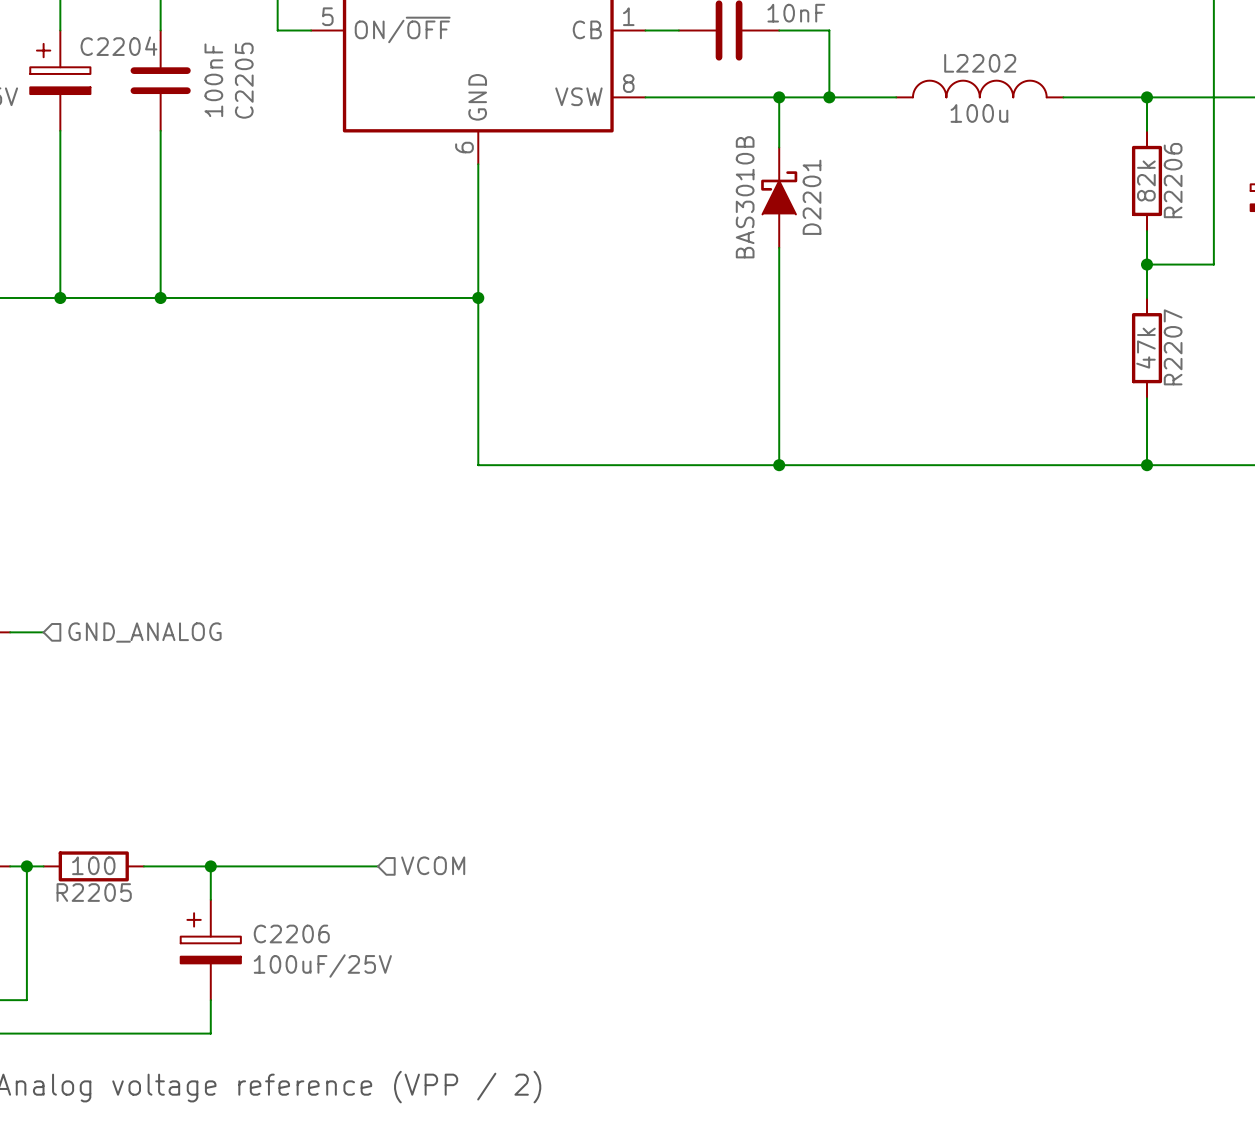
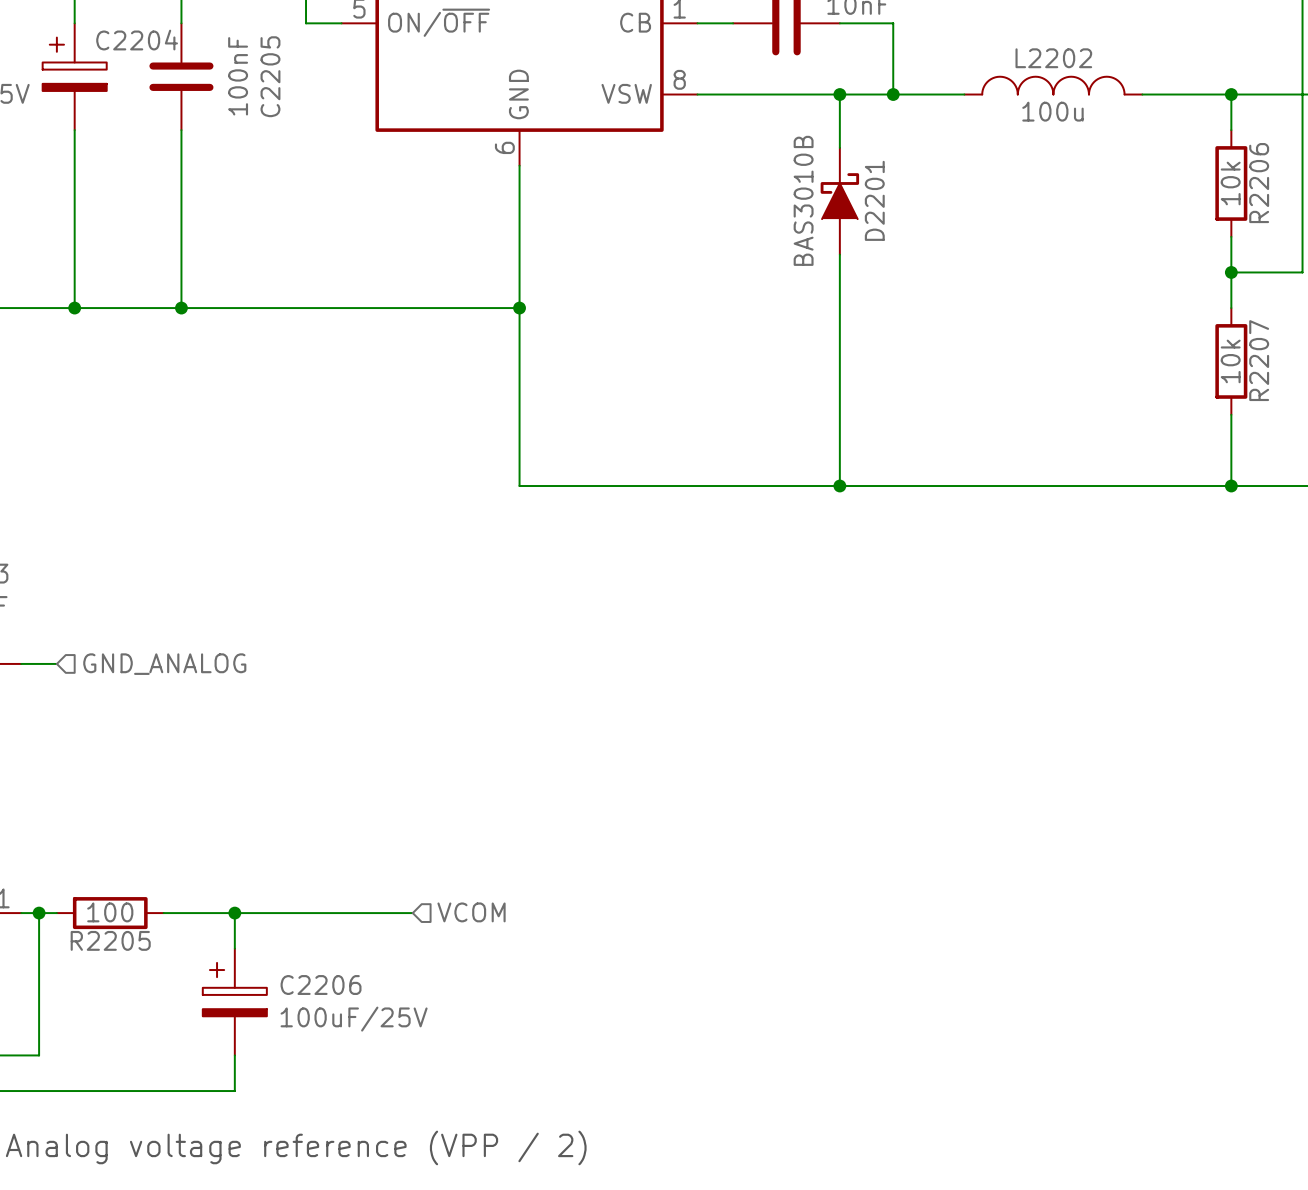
R2206 value: 82k (1146, 180) -> 10k (1230, 183)
R2207 value: 47k (1145, 348) -> 10k (1230, 361)

